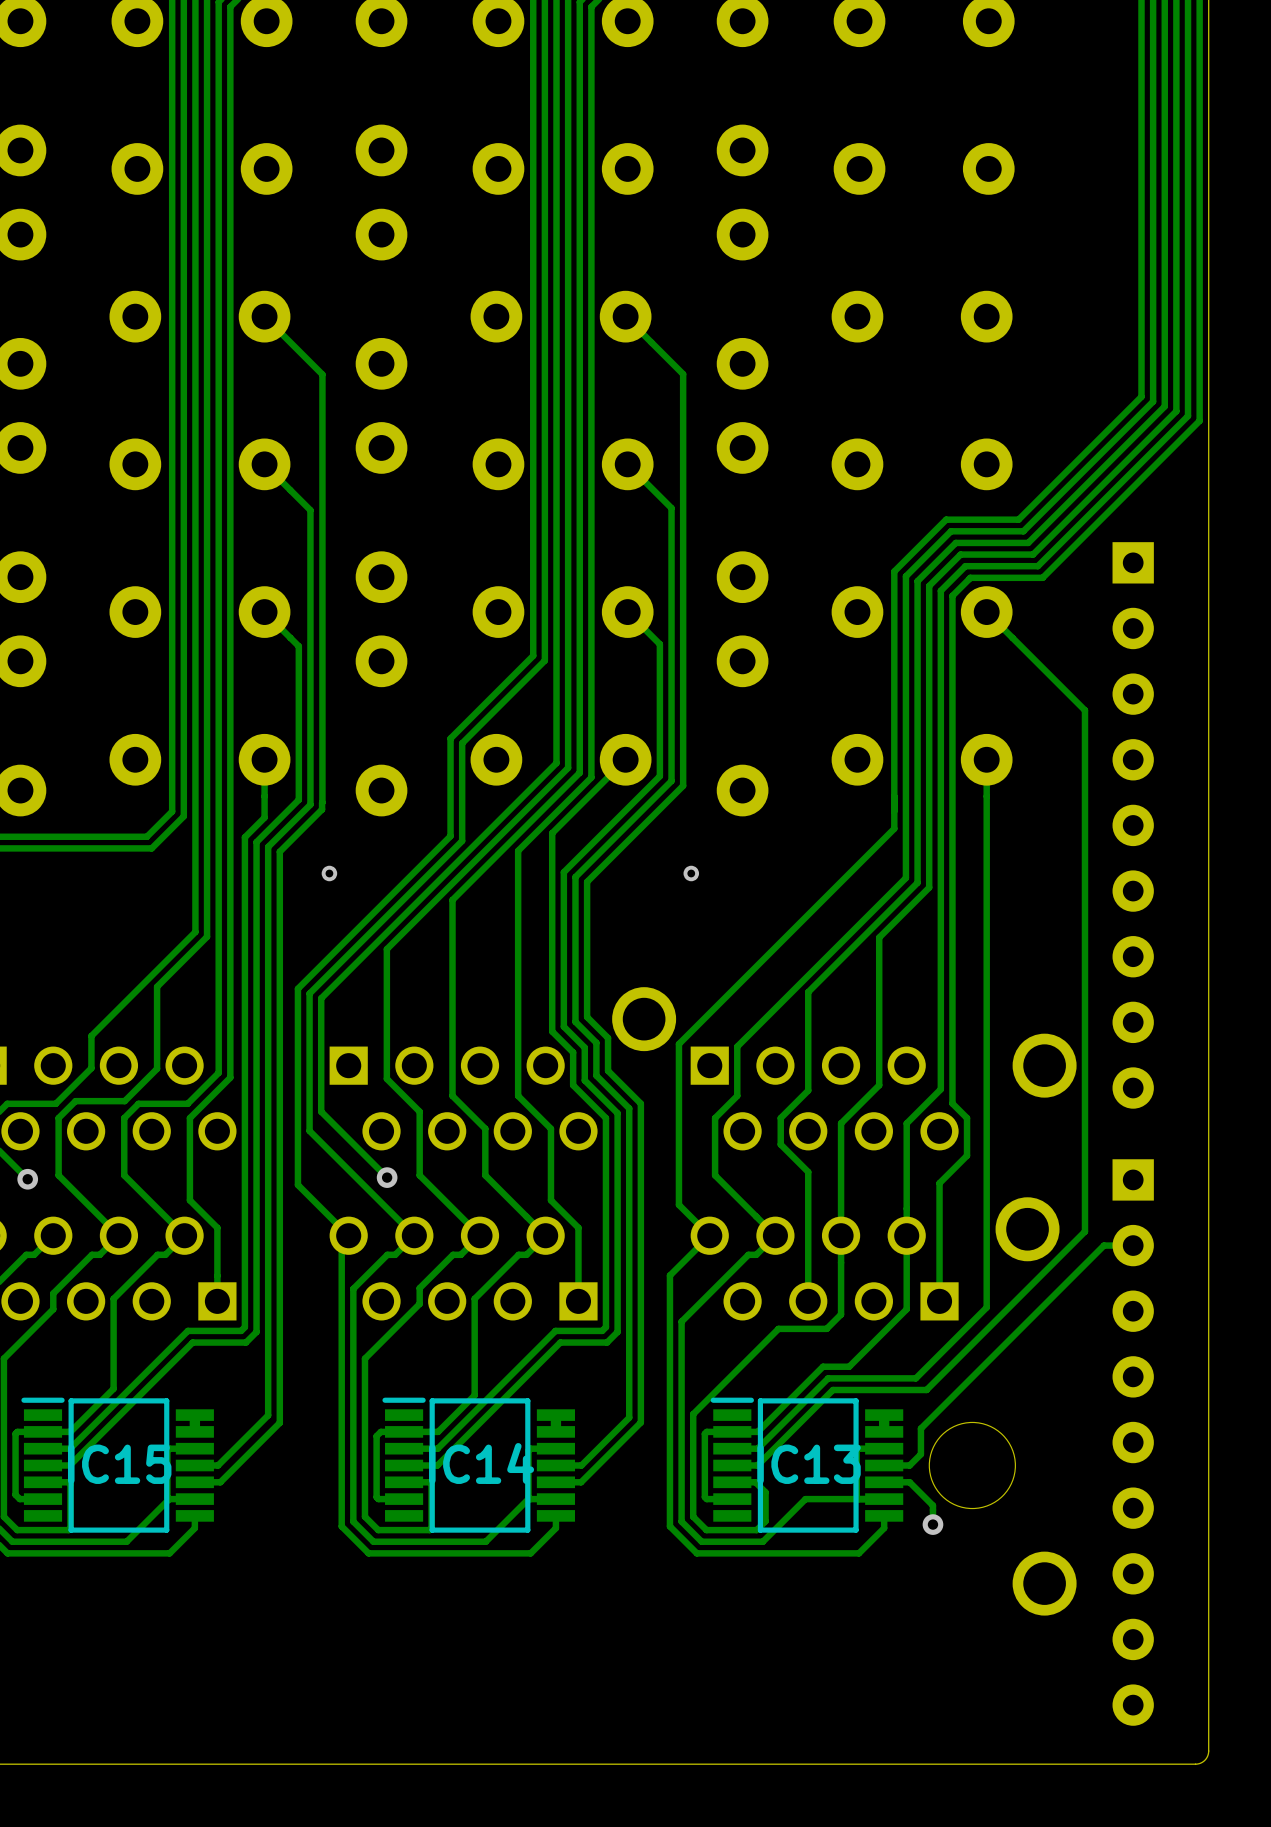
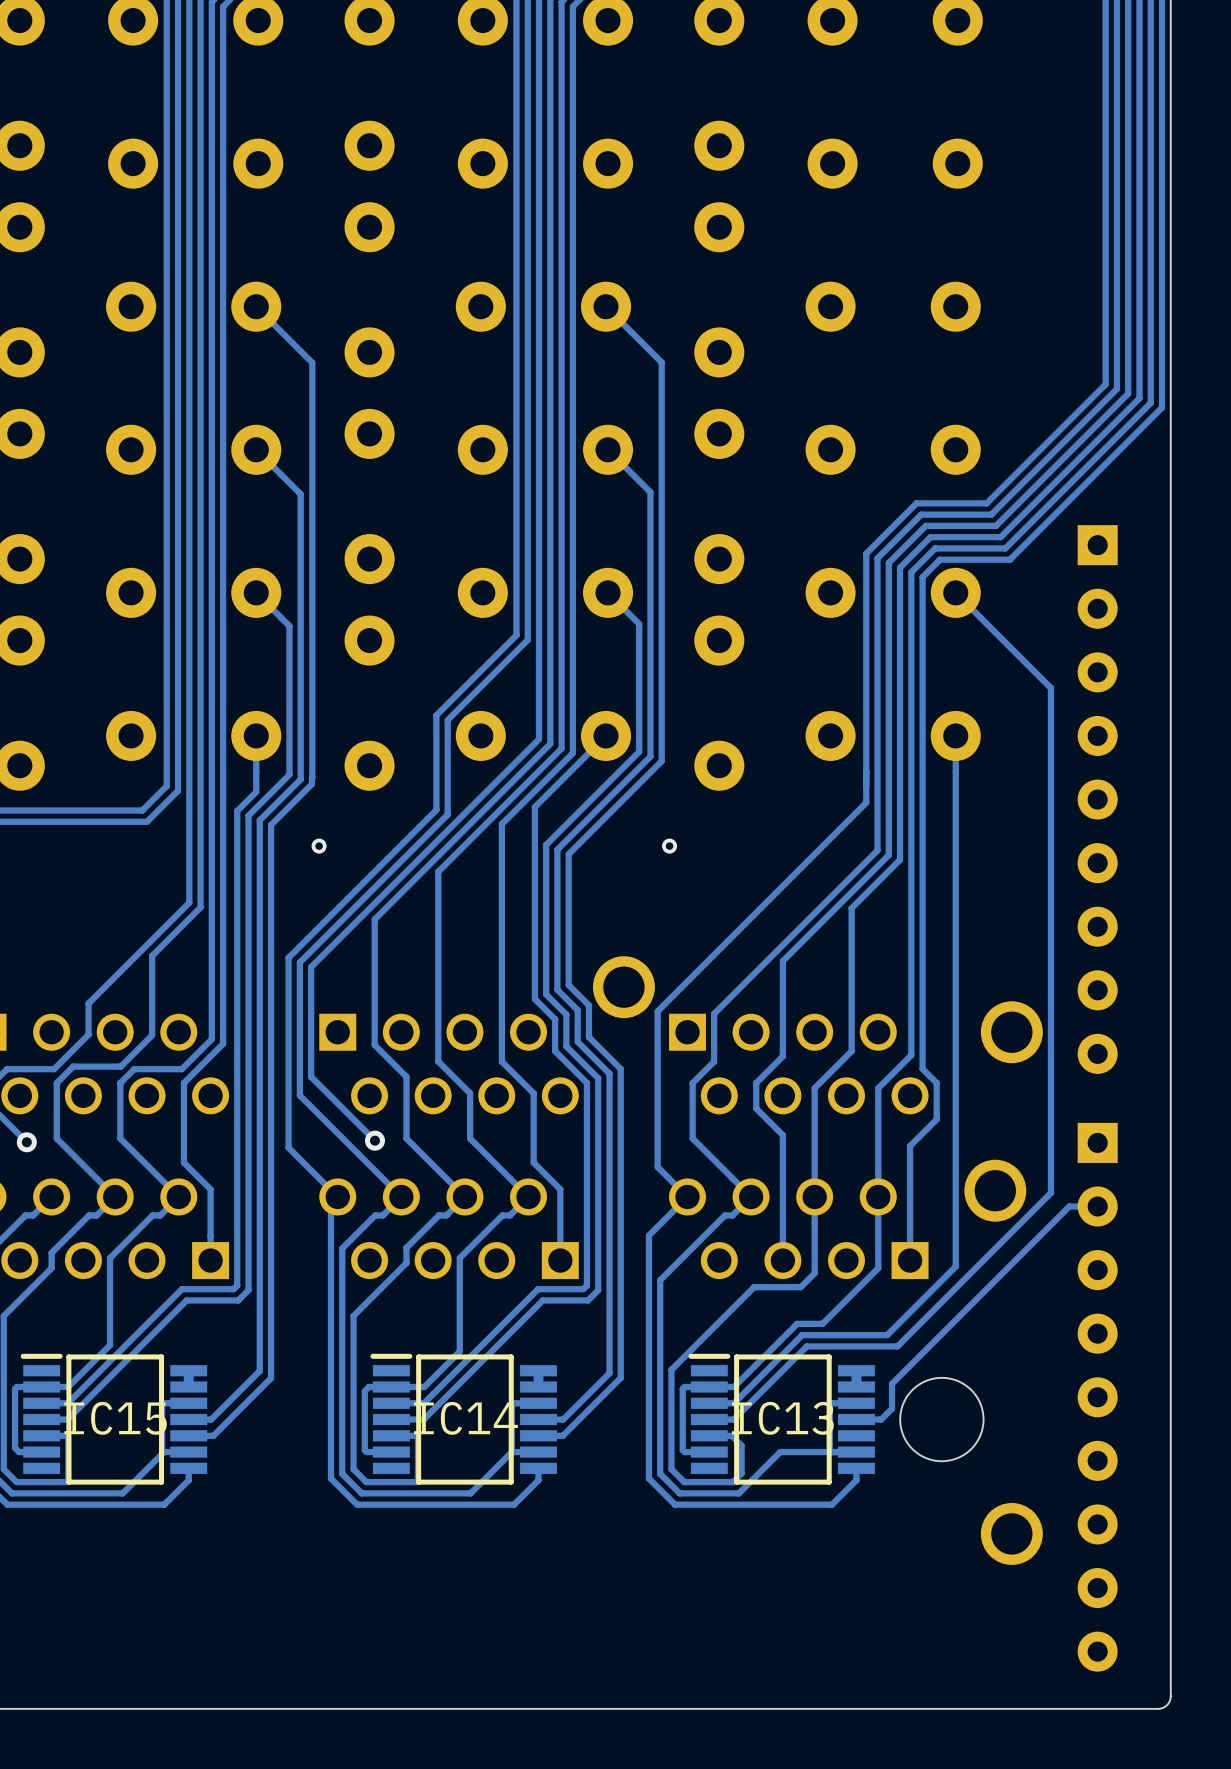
track: (884, 1482) (909, 1482) (932, 1505) (932, 1524) -> none
via: (932, 1524) -> none

